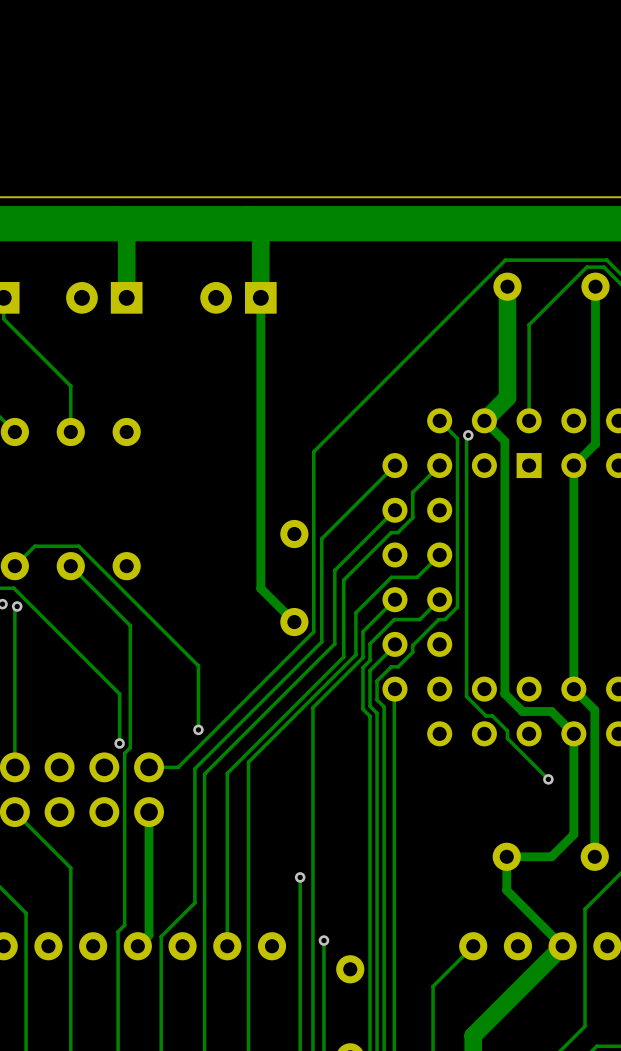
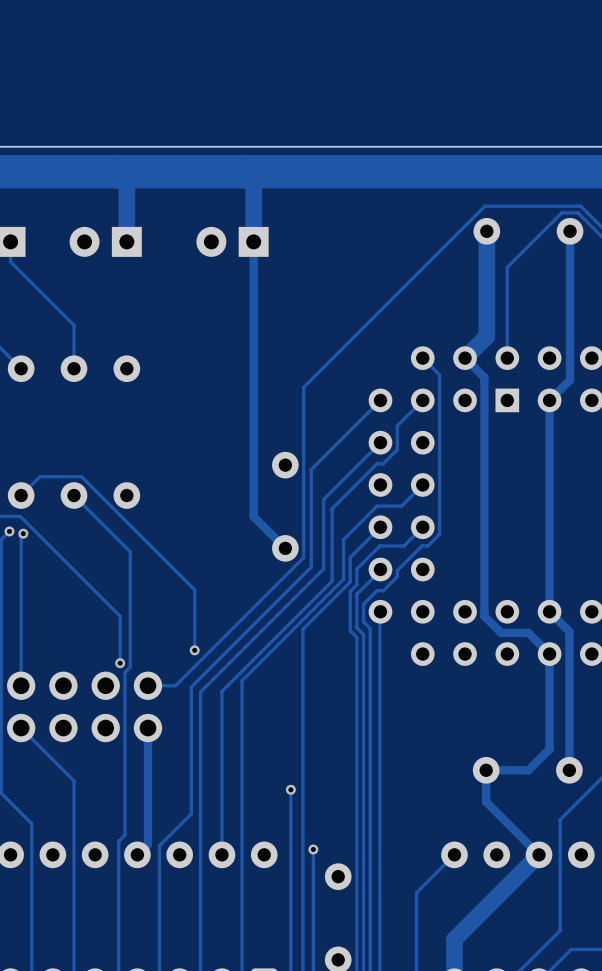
track: (468, 435) (466, 437) (466, 696) (486, 716) (492, 716) (507, 730) (507, 738) (548, 779) -> none
via: (468, 435) -> none
via: (548, 779) -> none

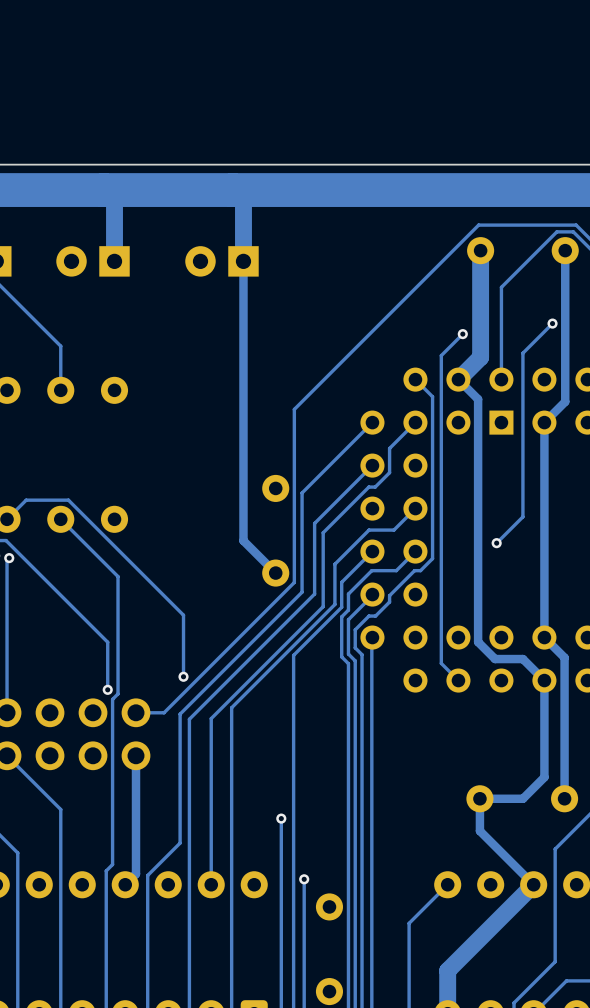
track: none -> (552, 323) (522, 353) (522, 516) (496, 543)
via: none -> (552, 323)
track: none -> (462, 334) (441, 355) (441, 663) (458, 680)
via: none -> (462, 334)
via: none -> (496, 543)

